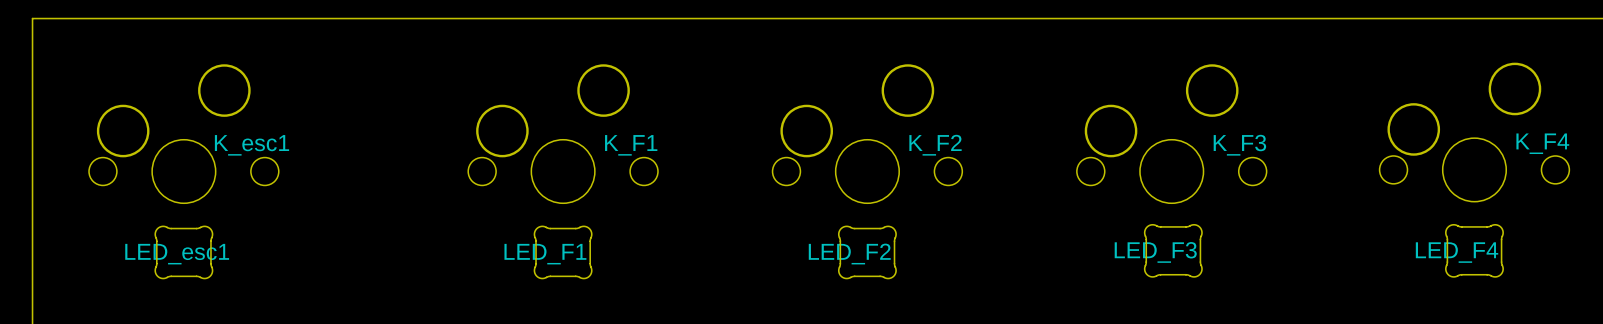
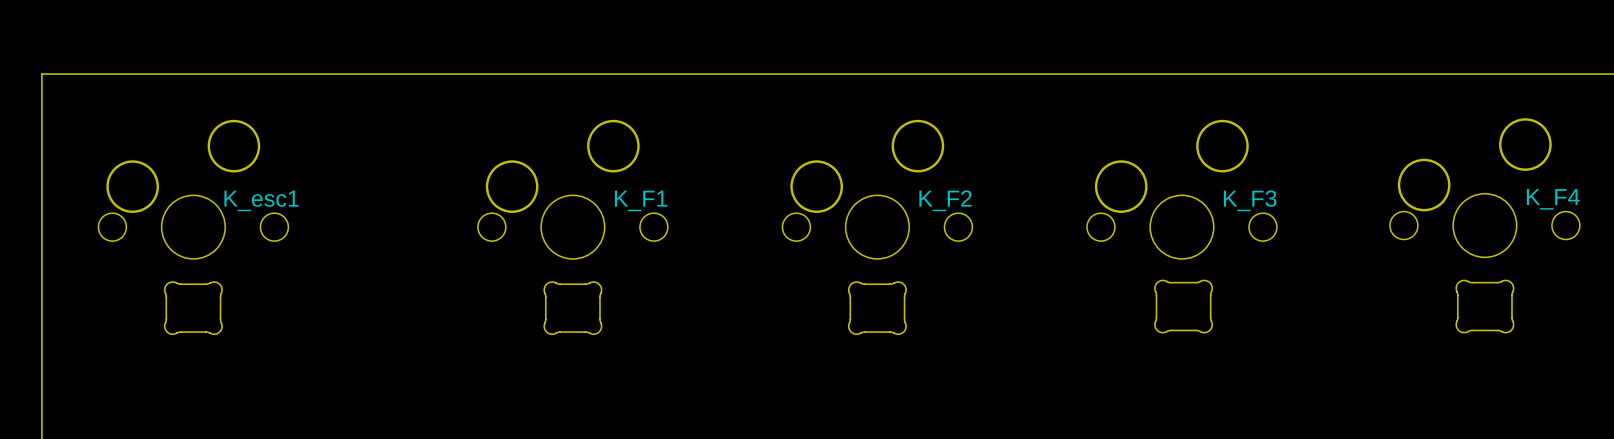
LED_F3 name: LED_F3 (1155, 252) -> none
LED_F4 name: LED_F4 (1457, 252) -> none
LED_esc1 name: LED_esc1 (177, 254) -> none
LED_F1 name: LED_F1 (545, 254) -> none
LED_F2 name: LED_F2 (849, 254) -> none

